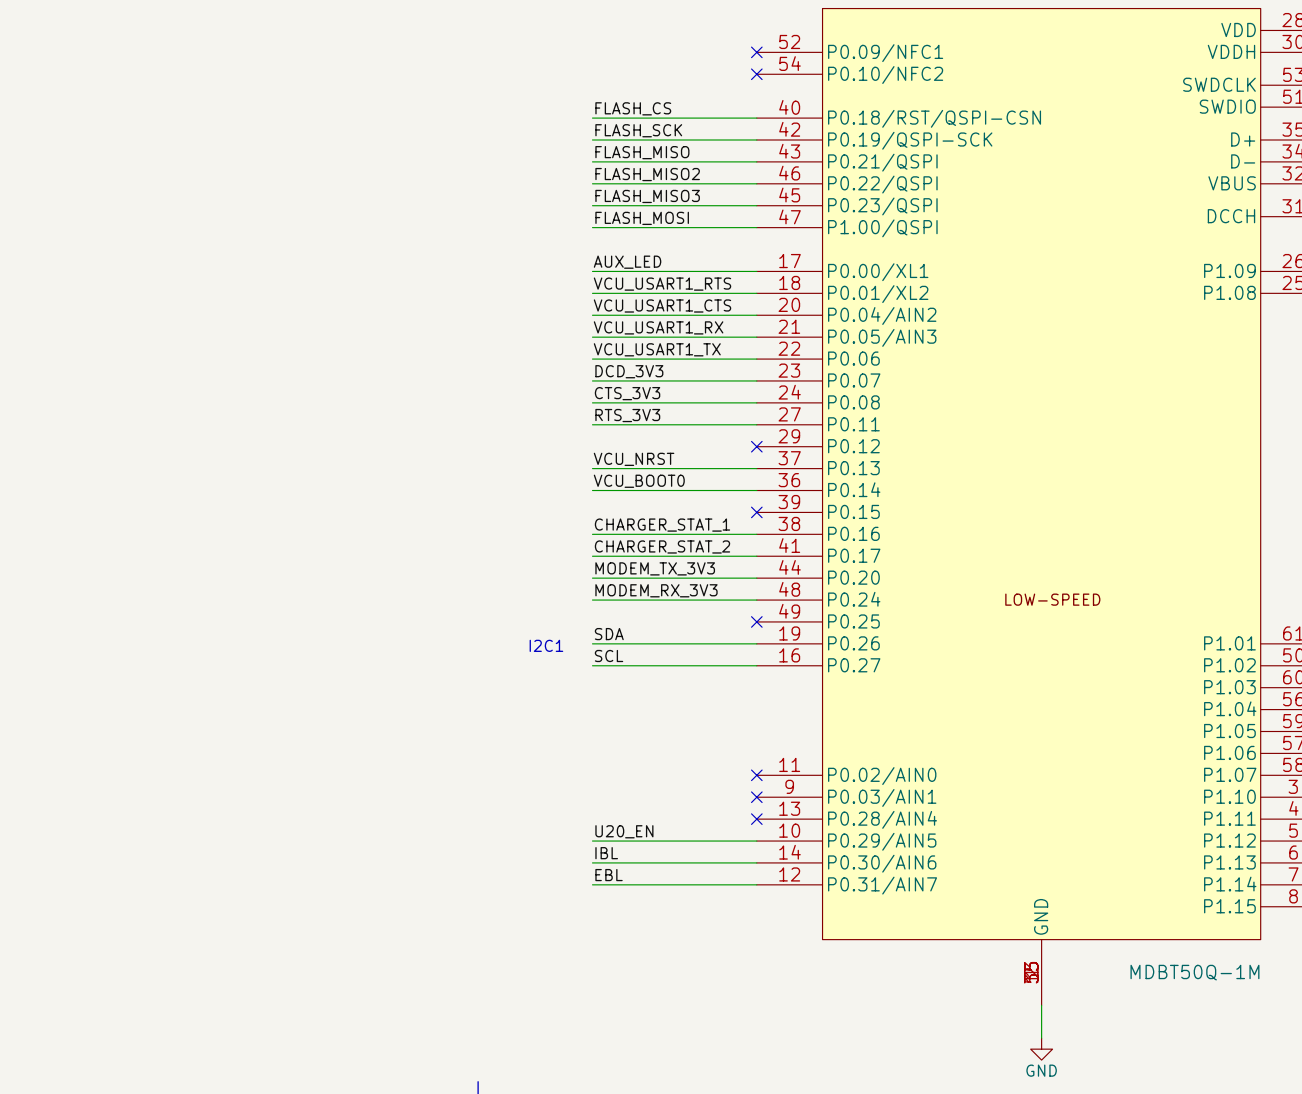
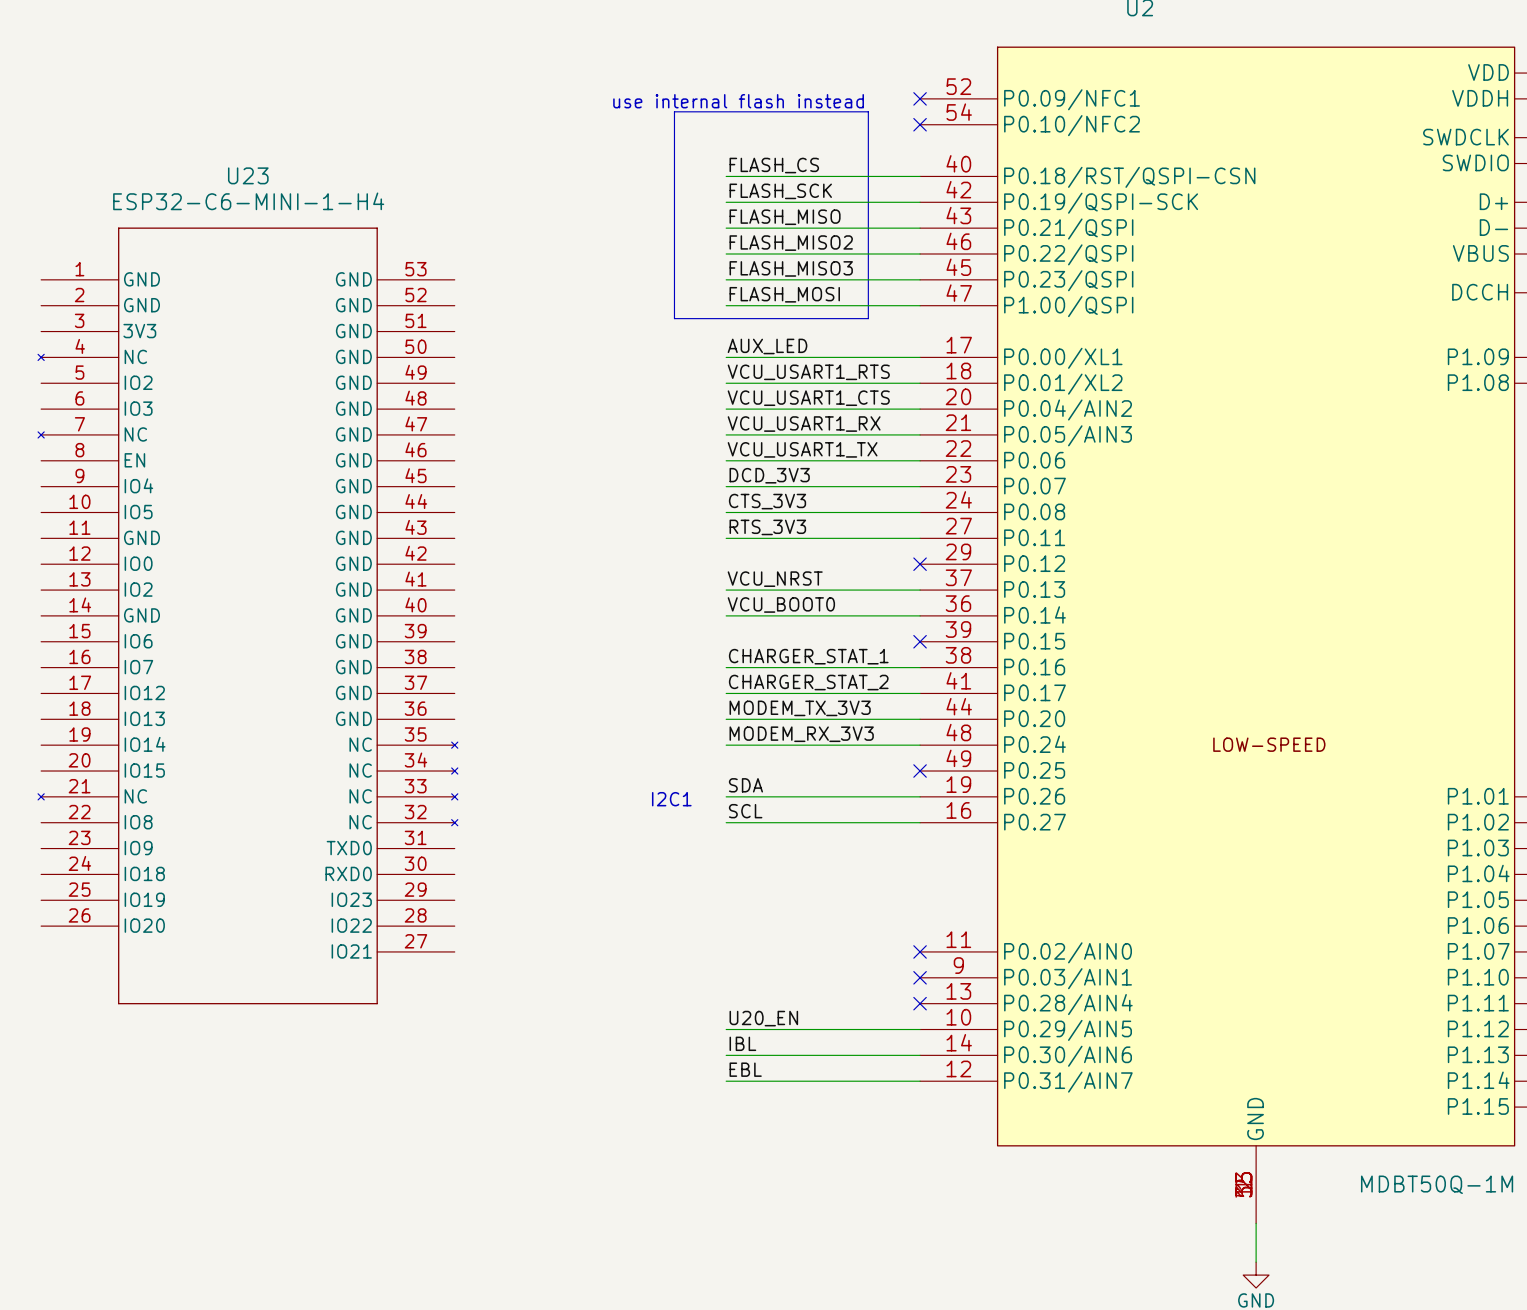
text: none -> use internal flash instead (738, 101)
line: none -> (674, 111) (868, 111) (868, 318) (674, 318) (674, 111)
U23: none -> ESP32-C6-MINI-1-H4 (247, 615)

